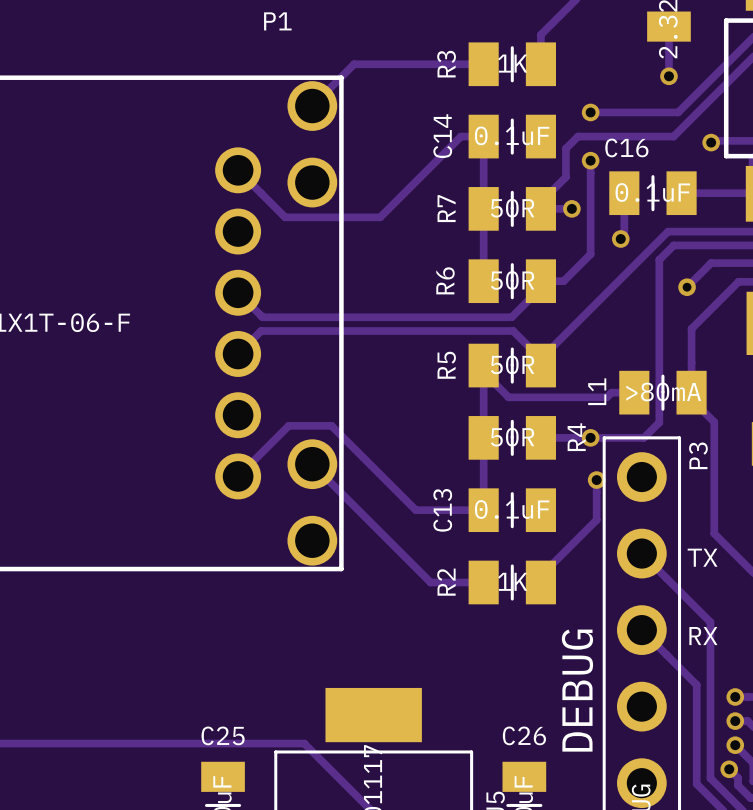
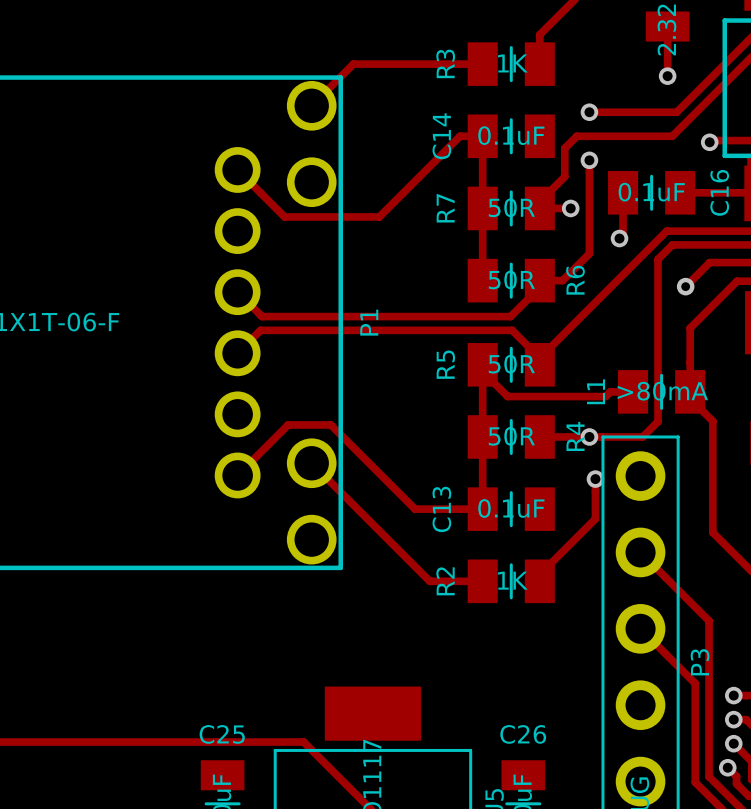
P1 name rotation: 0° (277, 21) -> 90° counterclockwise (369, 322)
P1 name position: P1 (277, 21) -> P1 (369, 322)
C16 name rotation: 0° (626, 147) -> 90° counterclockwise (719, 192)
C16 name position: C16 (626, 147) -> C16 (719, 192)
R6 name position: R6 (445, 280) -> R6 (575, 280)
P3 name position: P3 (698, 455) -> P3 (700, 662)
text: TX (702, 557) -> none
text: RX (703, 636) -> none
text: DEBUG (577, 690) -> none

